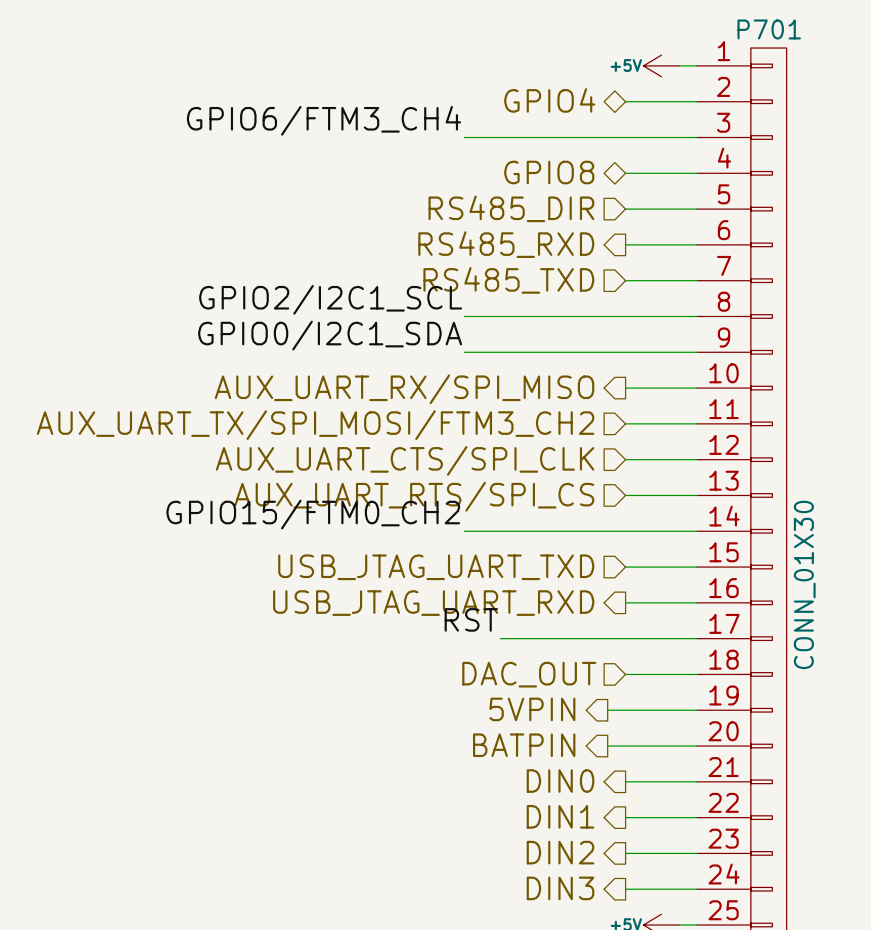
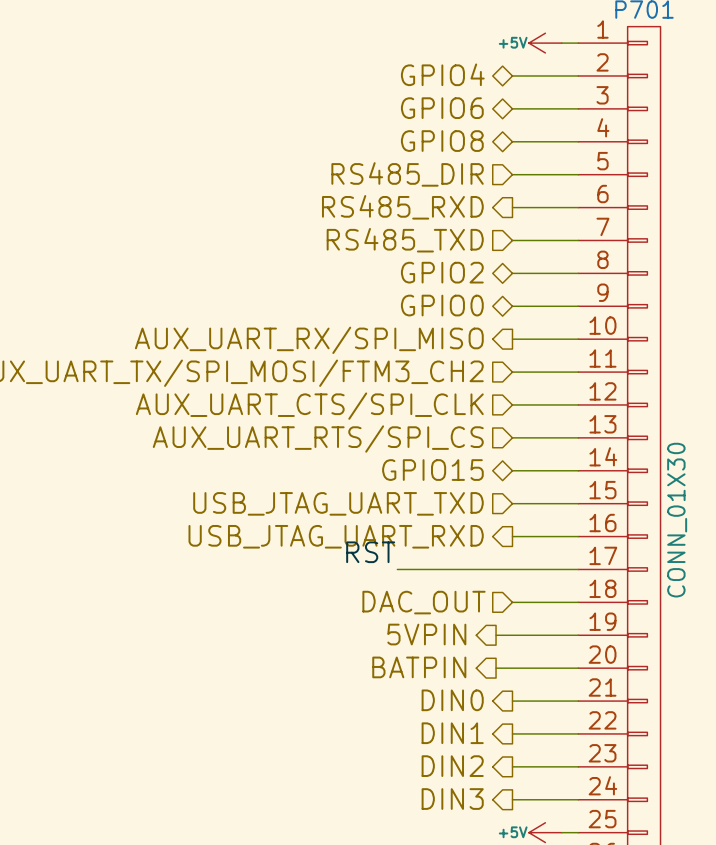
label: GPIO6/FTM3_CH4 (324, 120) -> none
hierarchical label: none -> GPIO6 (442, 108)
wire: (464, 137) (625, 137) -> none
label: GPIO2/I2C1_SCL (330, 299) -> none
hierarchical label: none -> GPIO2 (442, 272)
wire: (464, 316) (625, 316) -> none
label: GPIO0/I2C1_SDA (330, 335) -> none
hierarchical label: none -> GPIO0 (442, 305)
wire: (464, 352) (625, 352) -> none
label: GPIO15/FTM0_CH2 (313, 514) -> none
hierarchical label: none -> GPIO15 (432, 470)
wire: (464, 531) (625, 531) -> none

